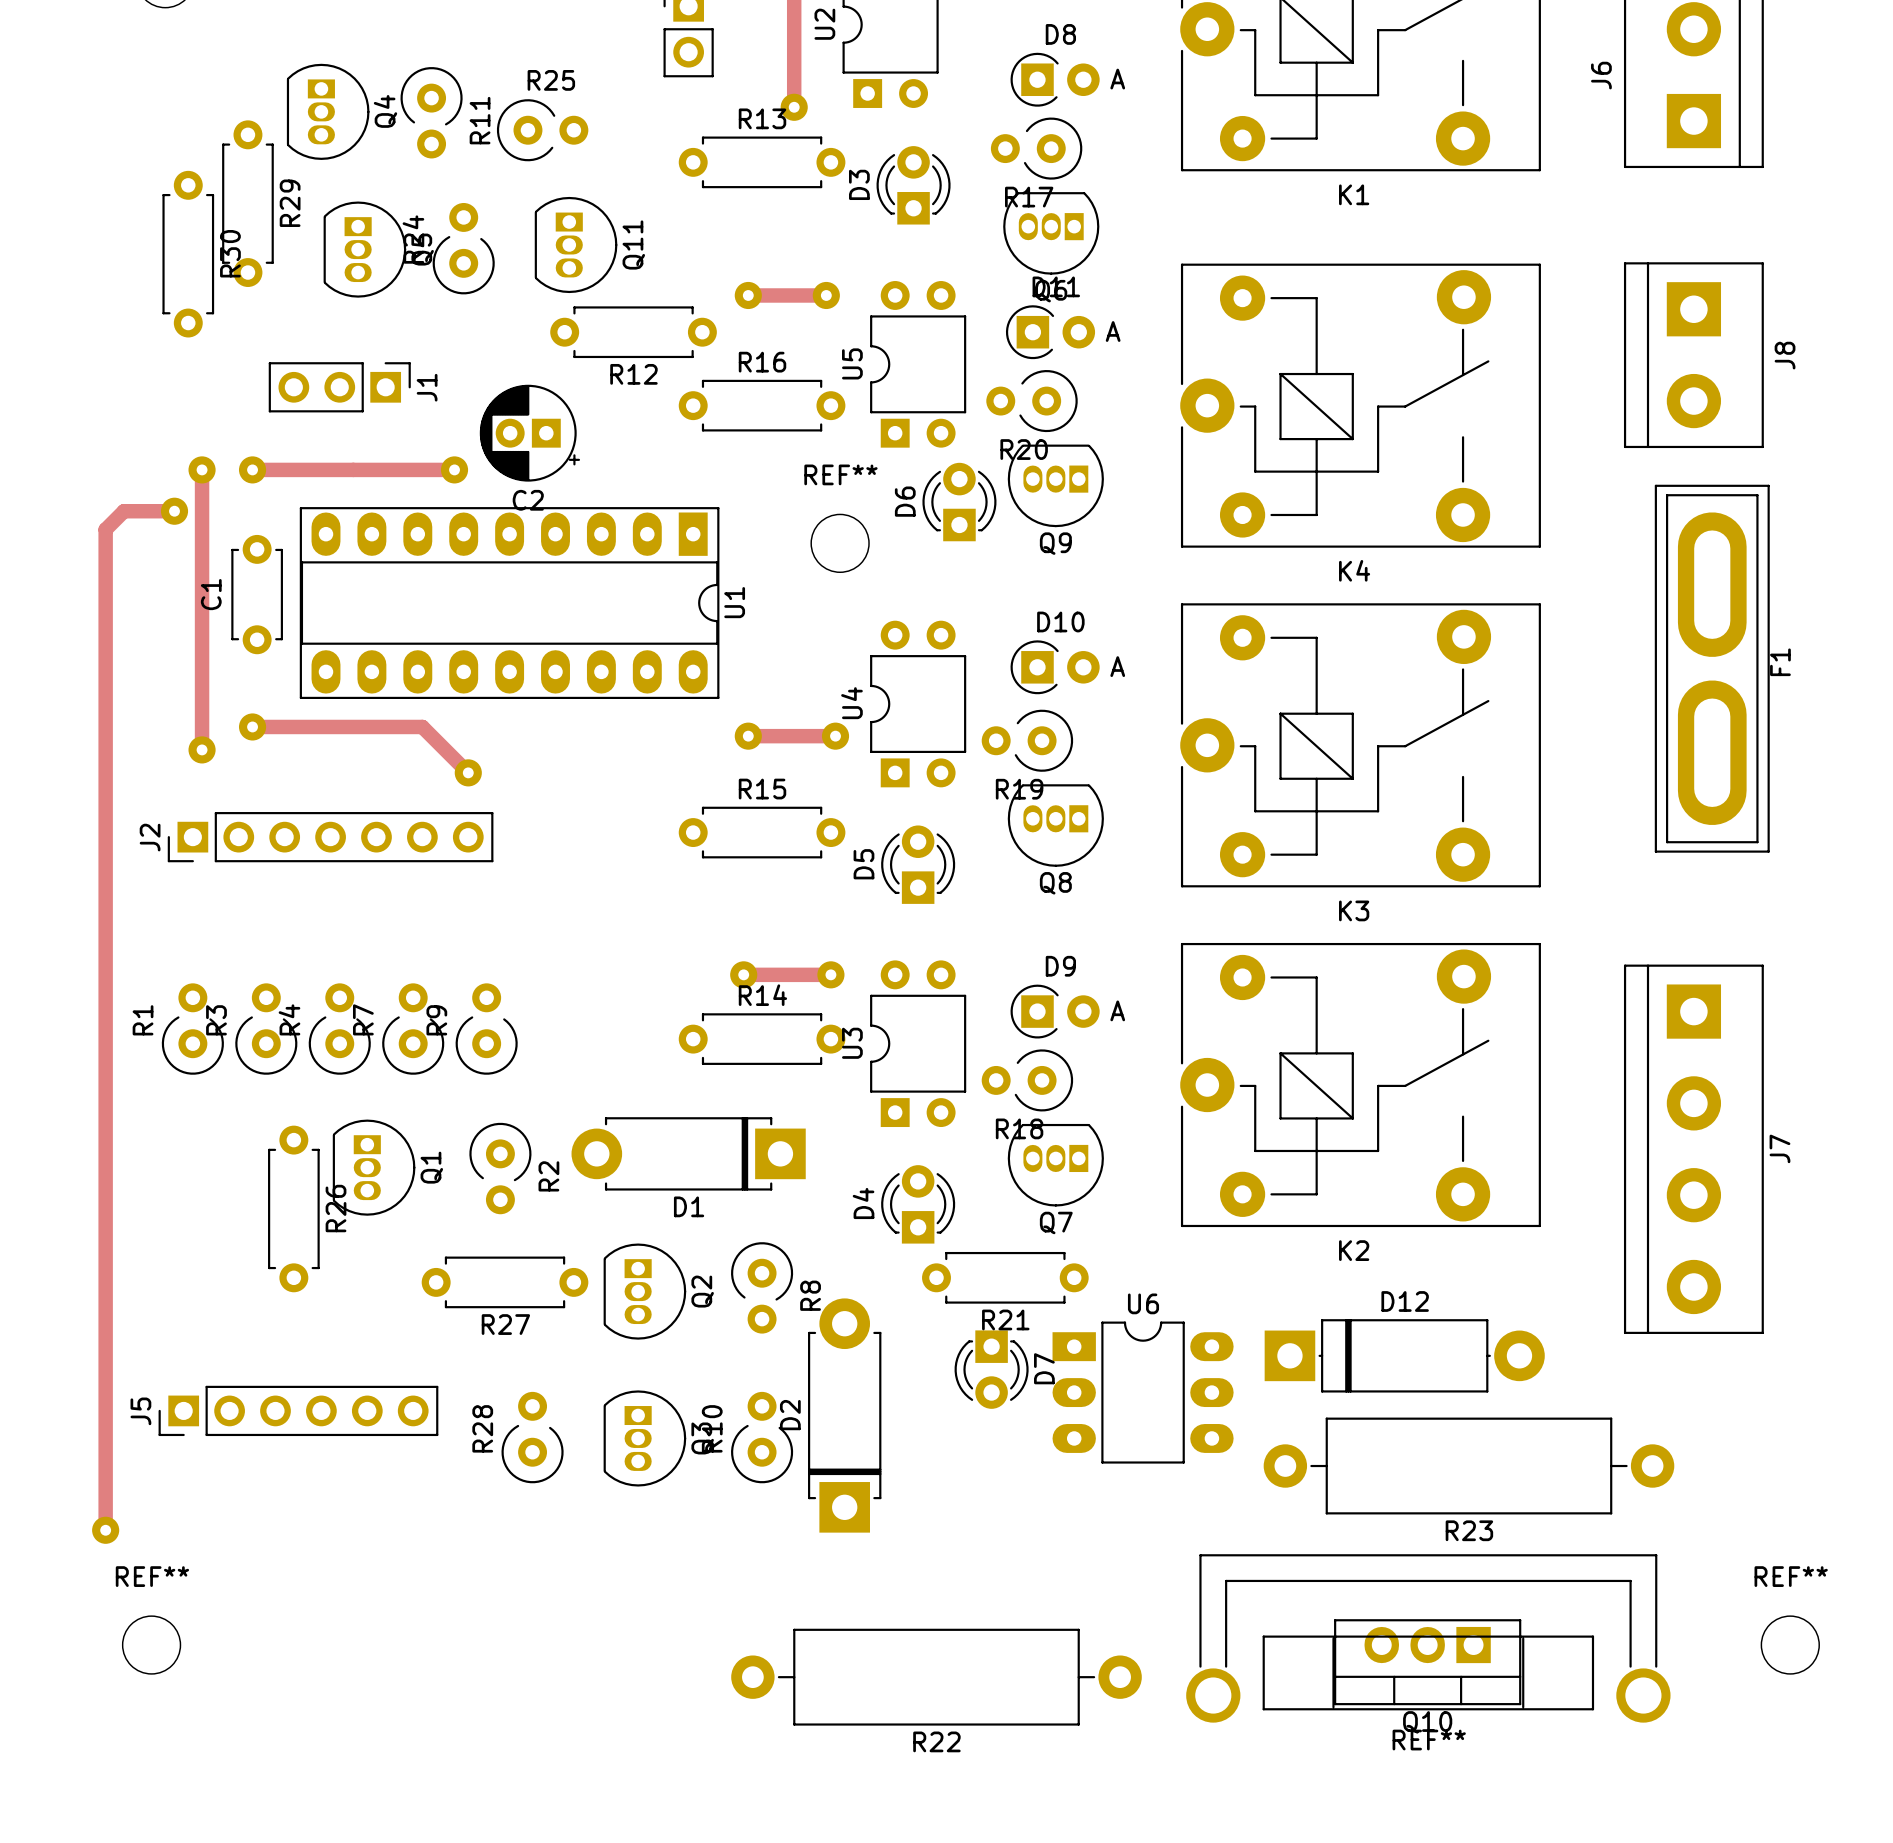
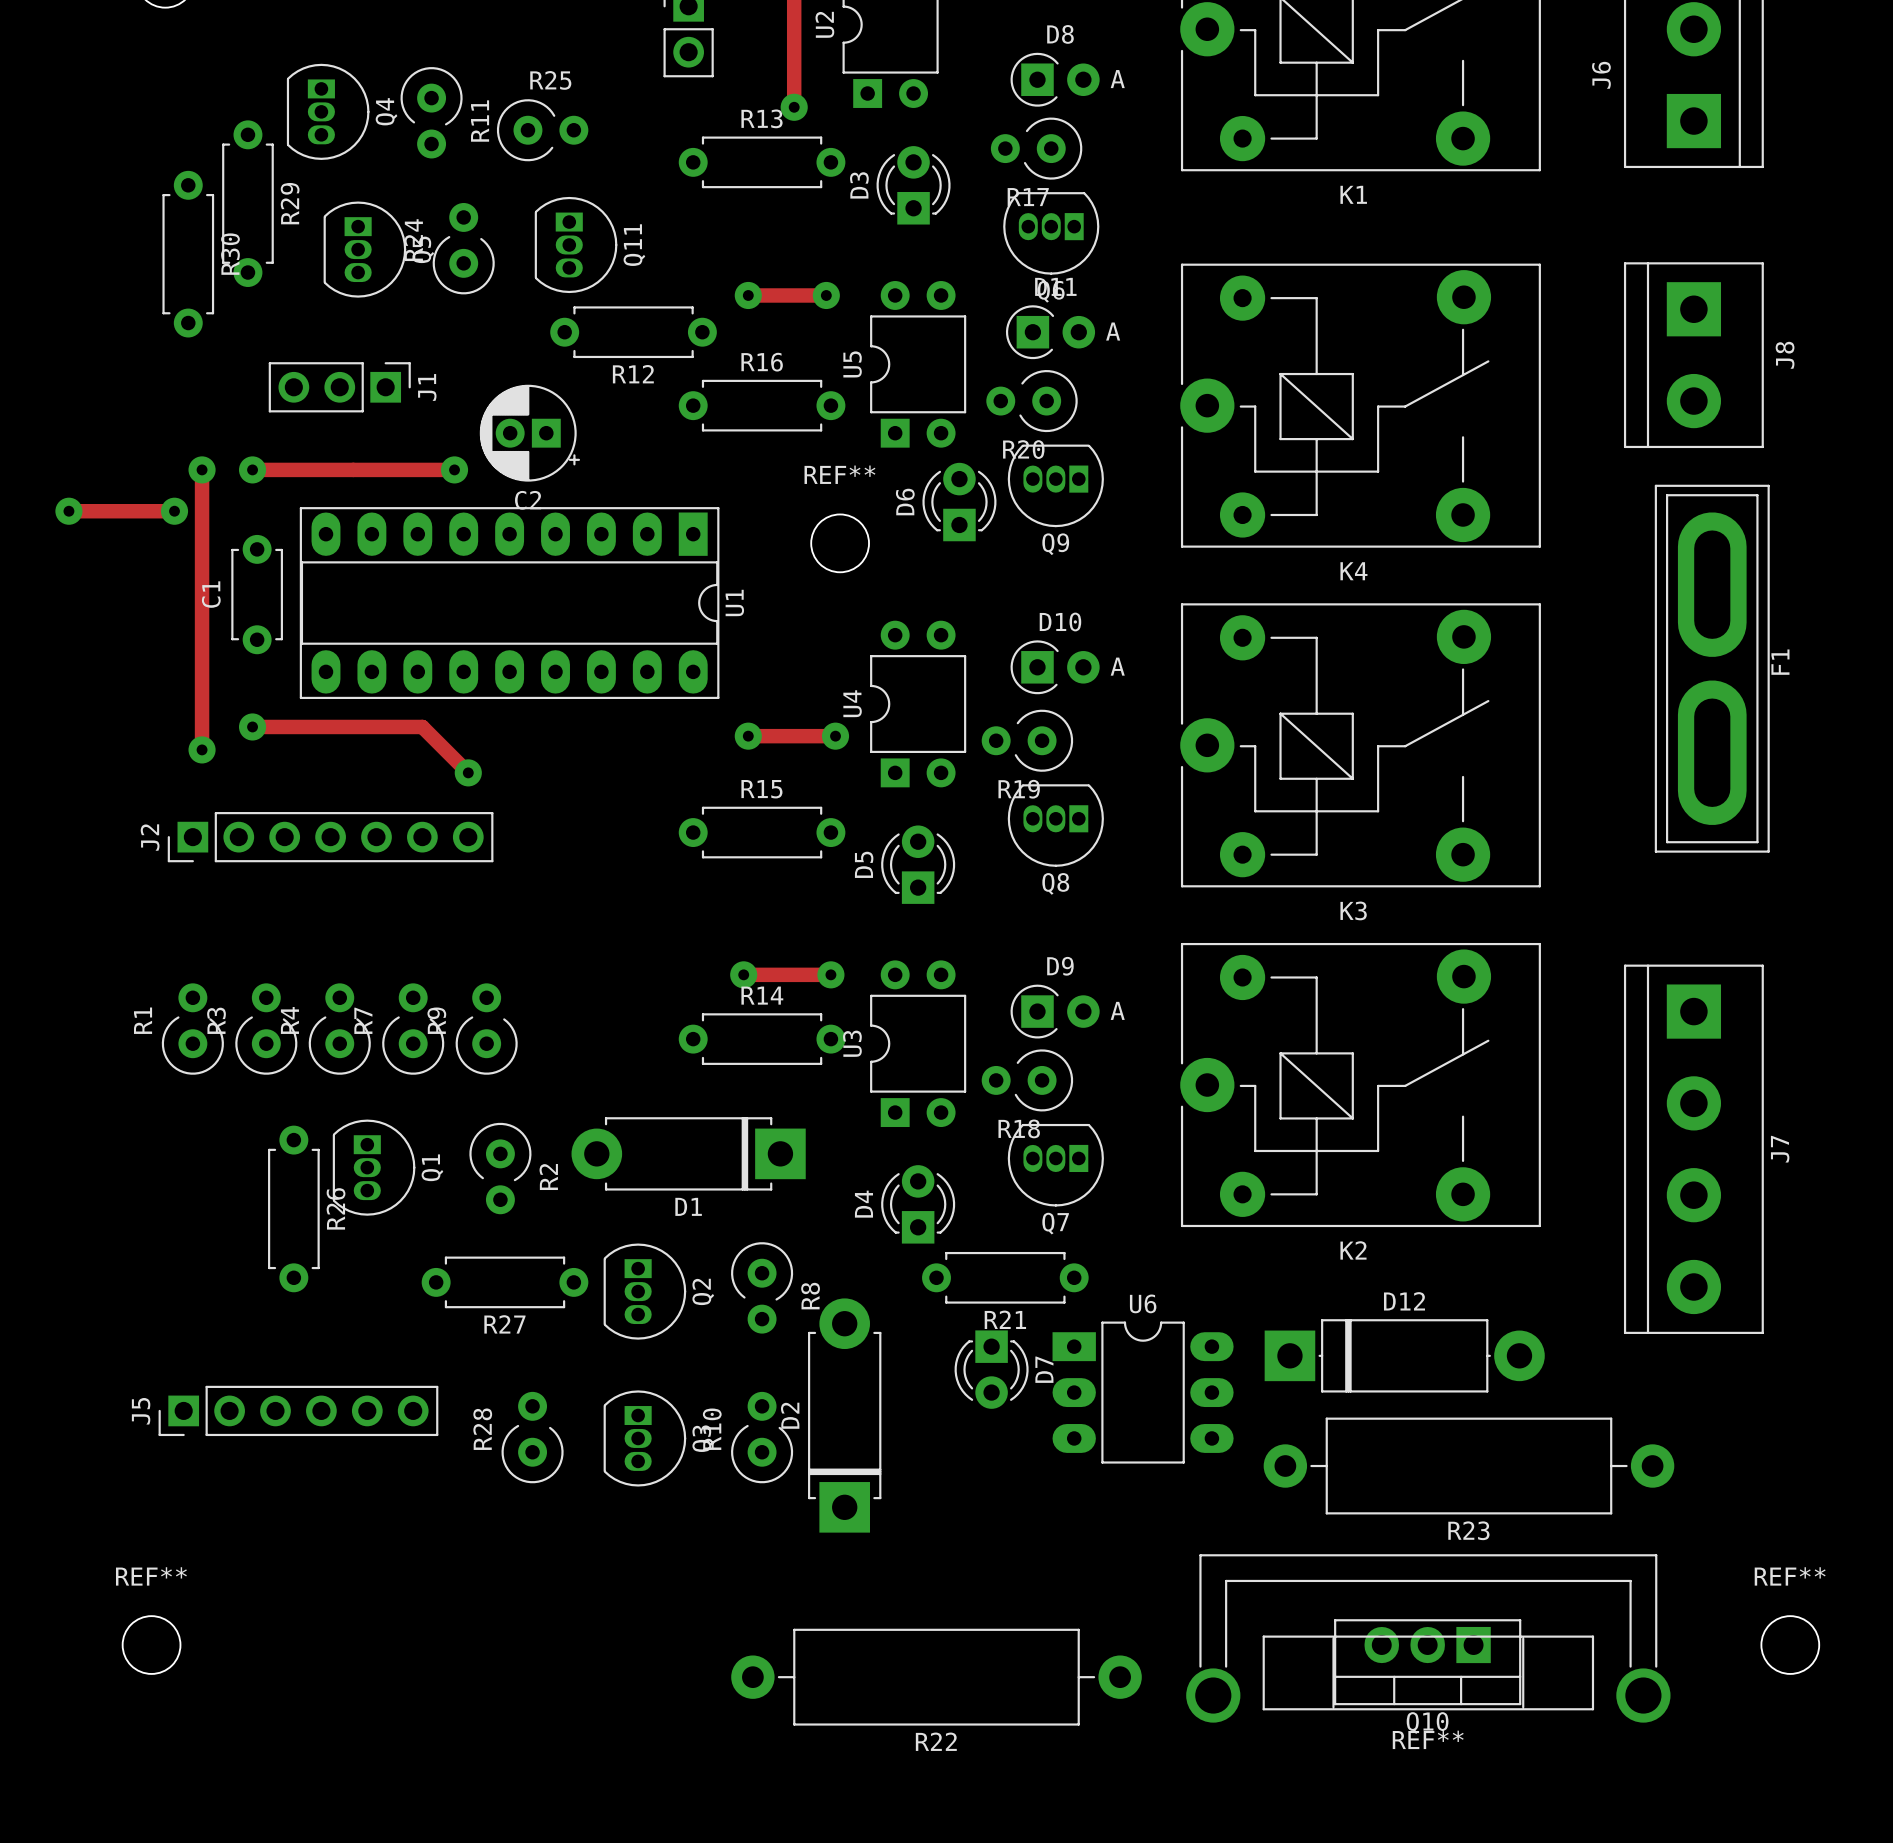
part: none -> (68, 511)
track: (124, 511) (105, 529) (105, 1530) -> (124, 511) (68, 511)
part: (105, 1530) -> none

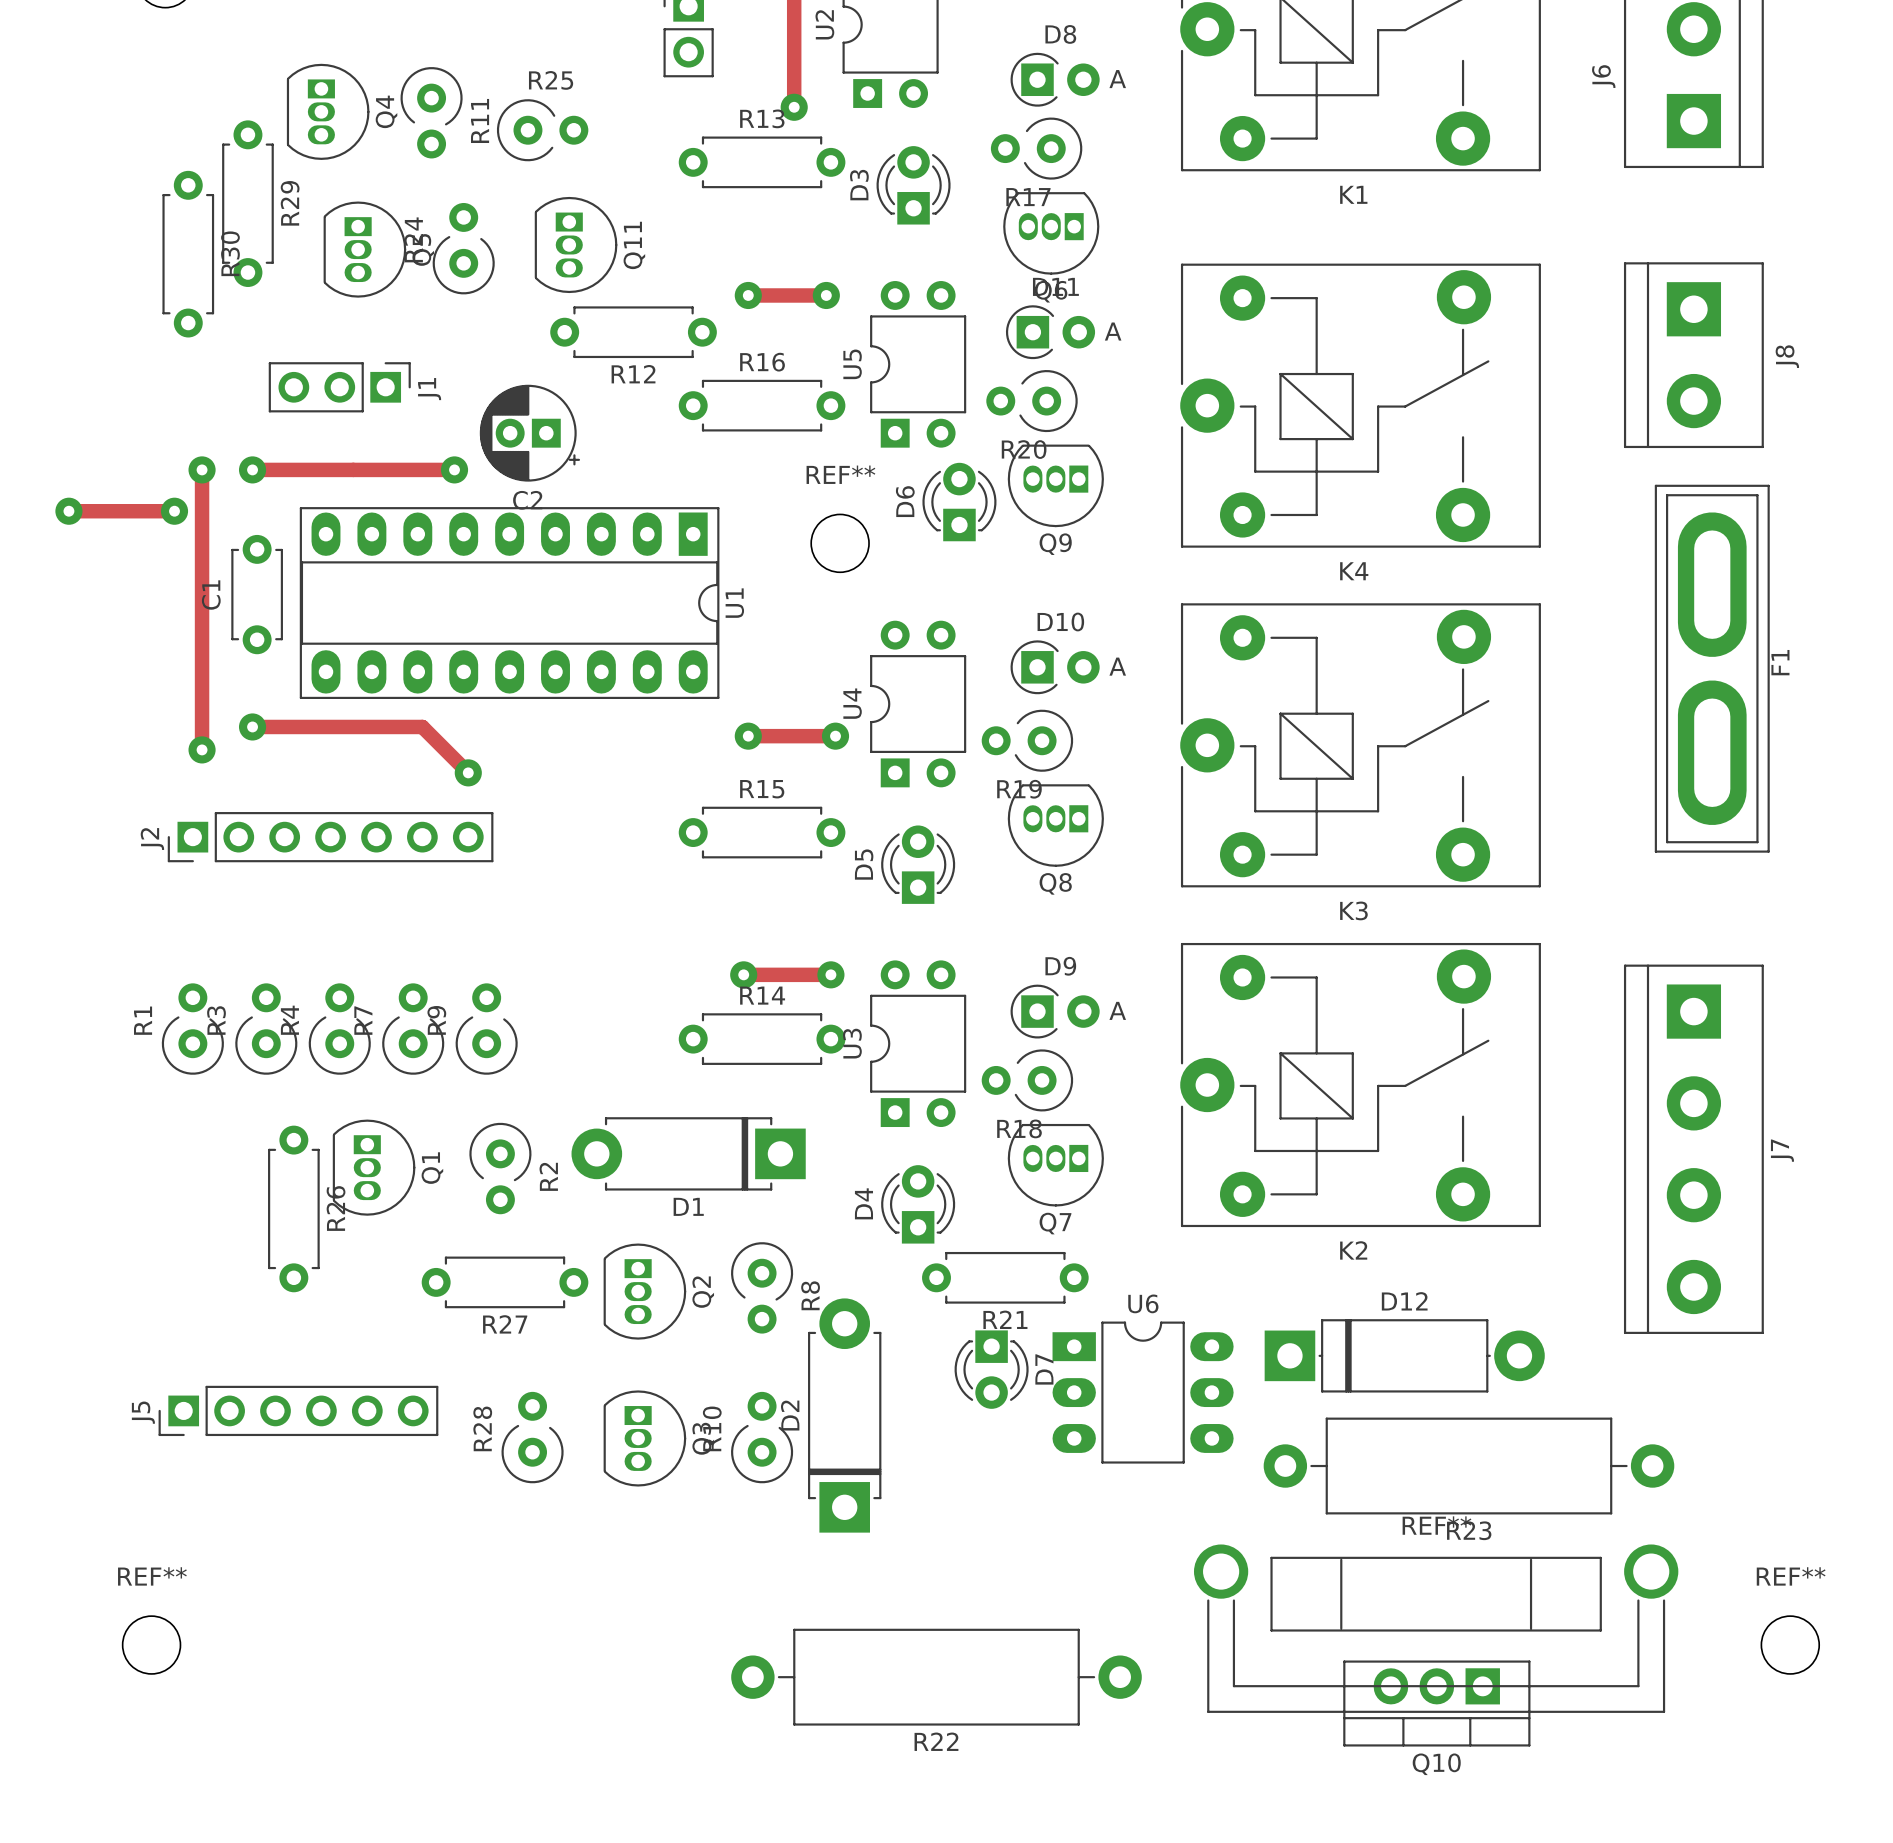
REF** rotation: 0° (1428, 1638) -> 180° (1436, 1628)
Q10 position: (1427, 1662) -> (1436, 1703)

